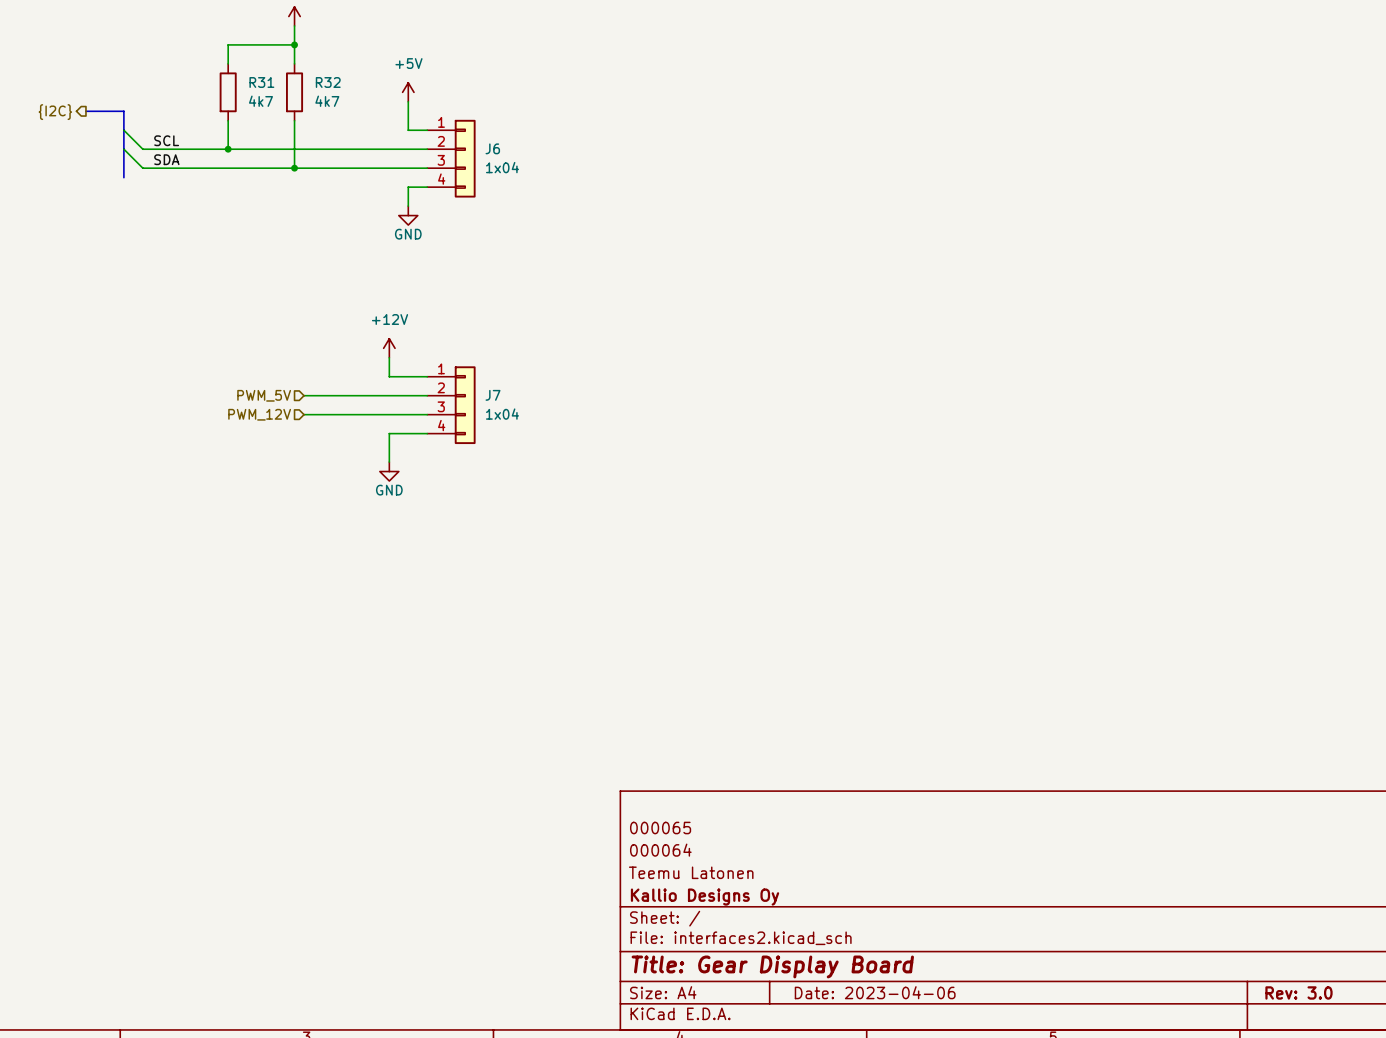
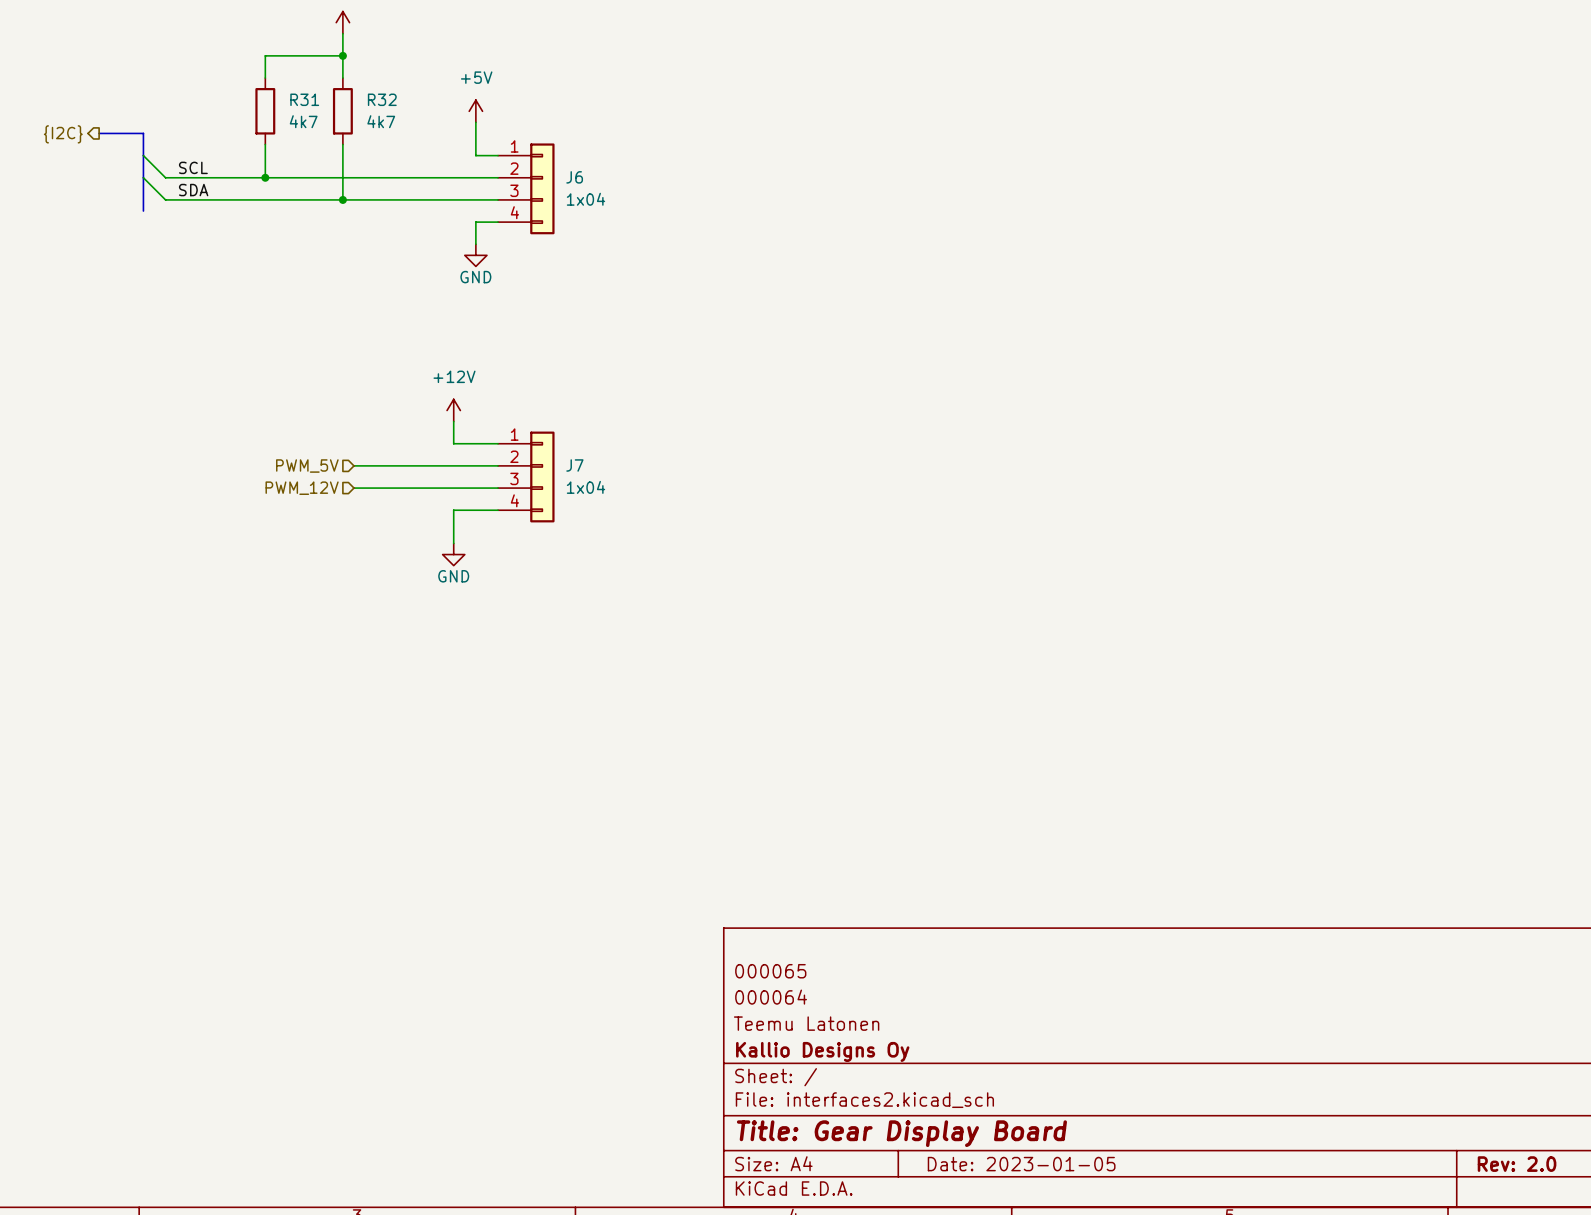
title block: Date: 2023-04-06 (875, 992) -> Date: 2023-01-05 (1021, 1164)
title block: Rev: 3.0 (1298, 992) -> Rev: 2.0 (1517, 1164)

